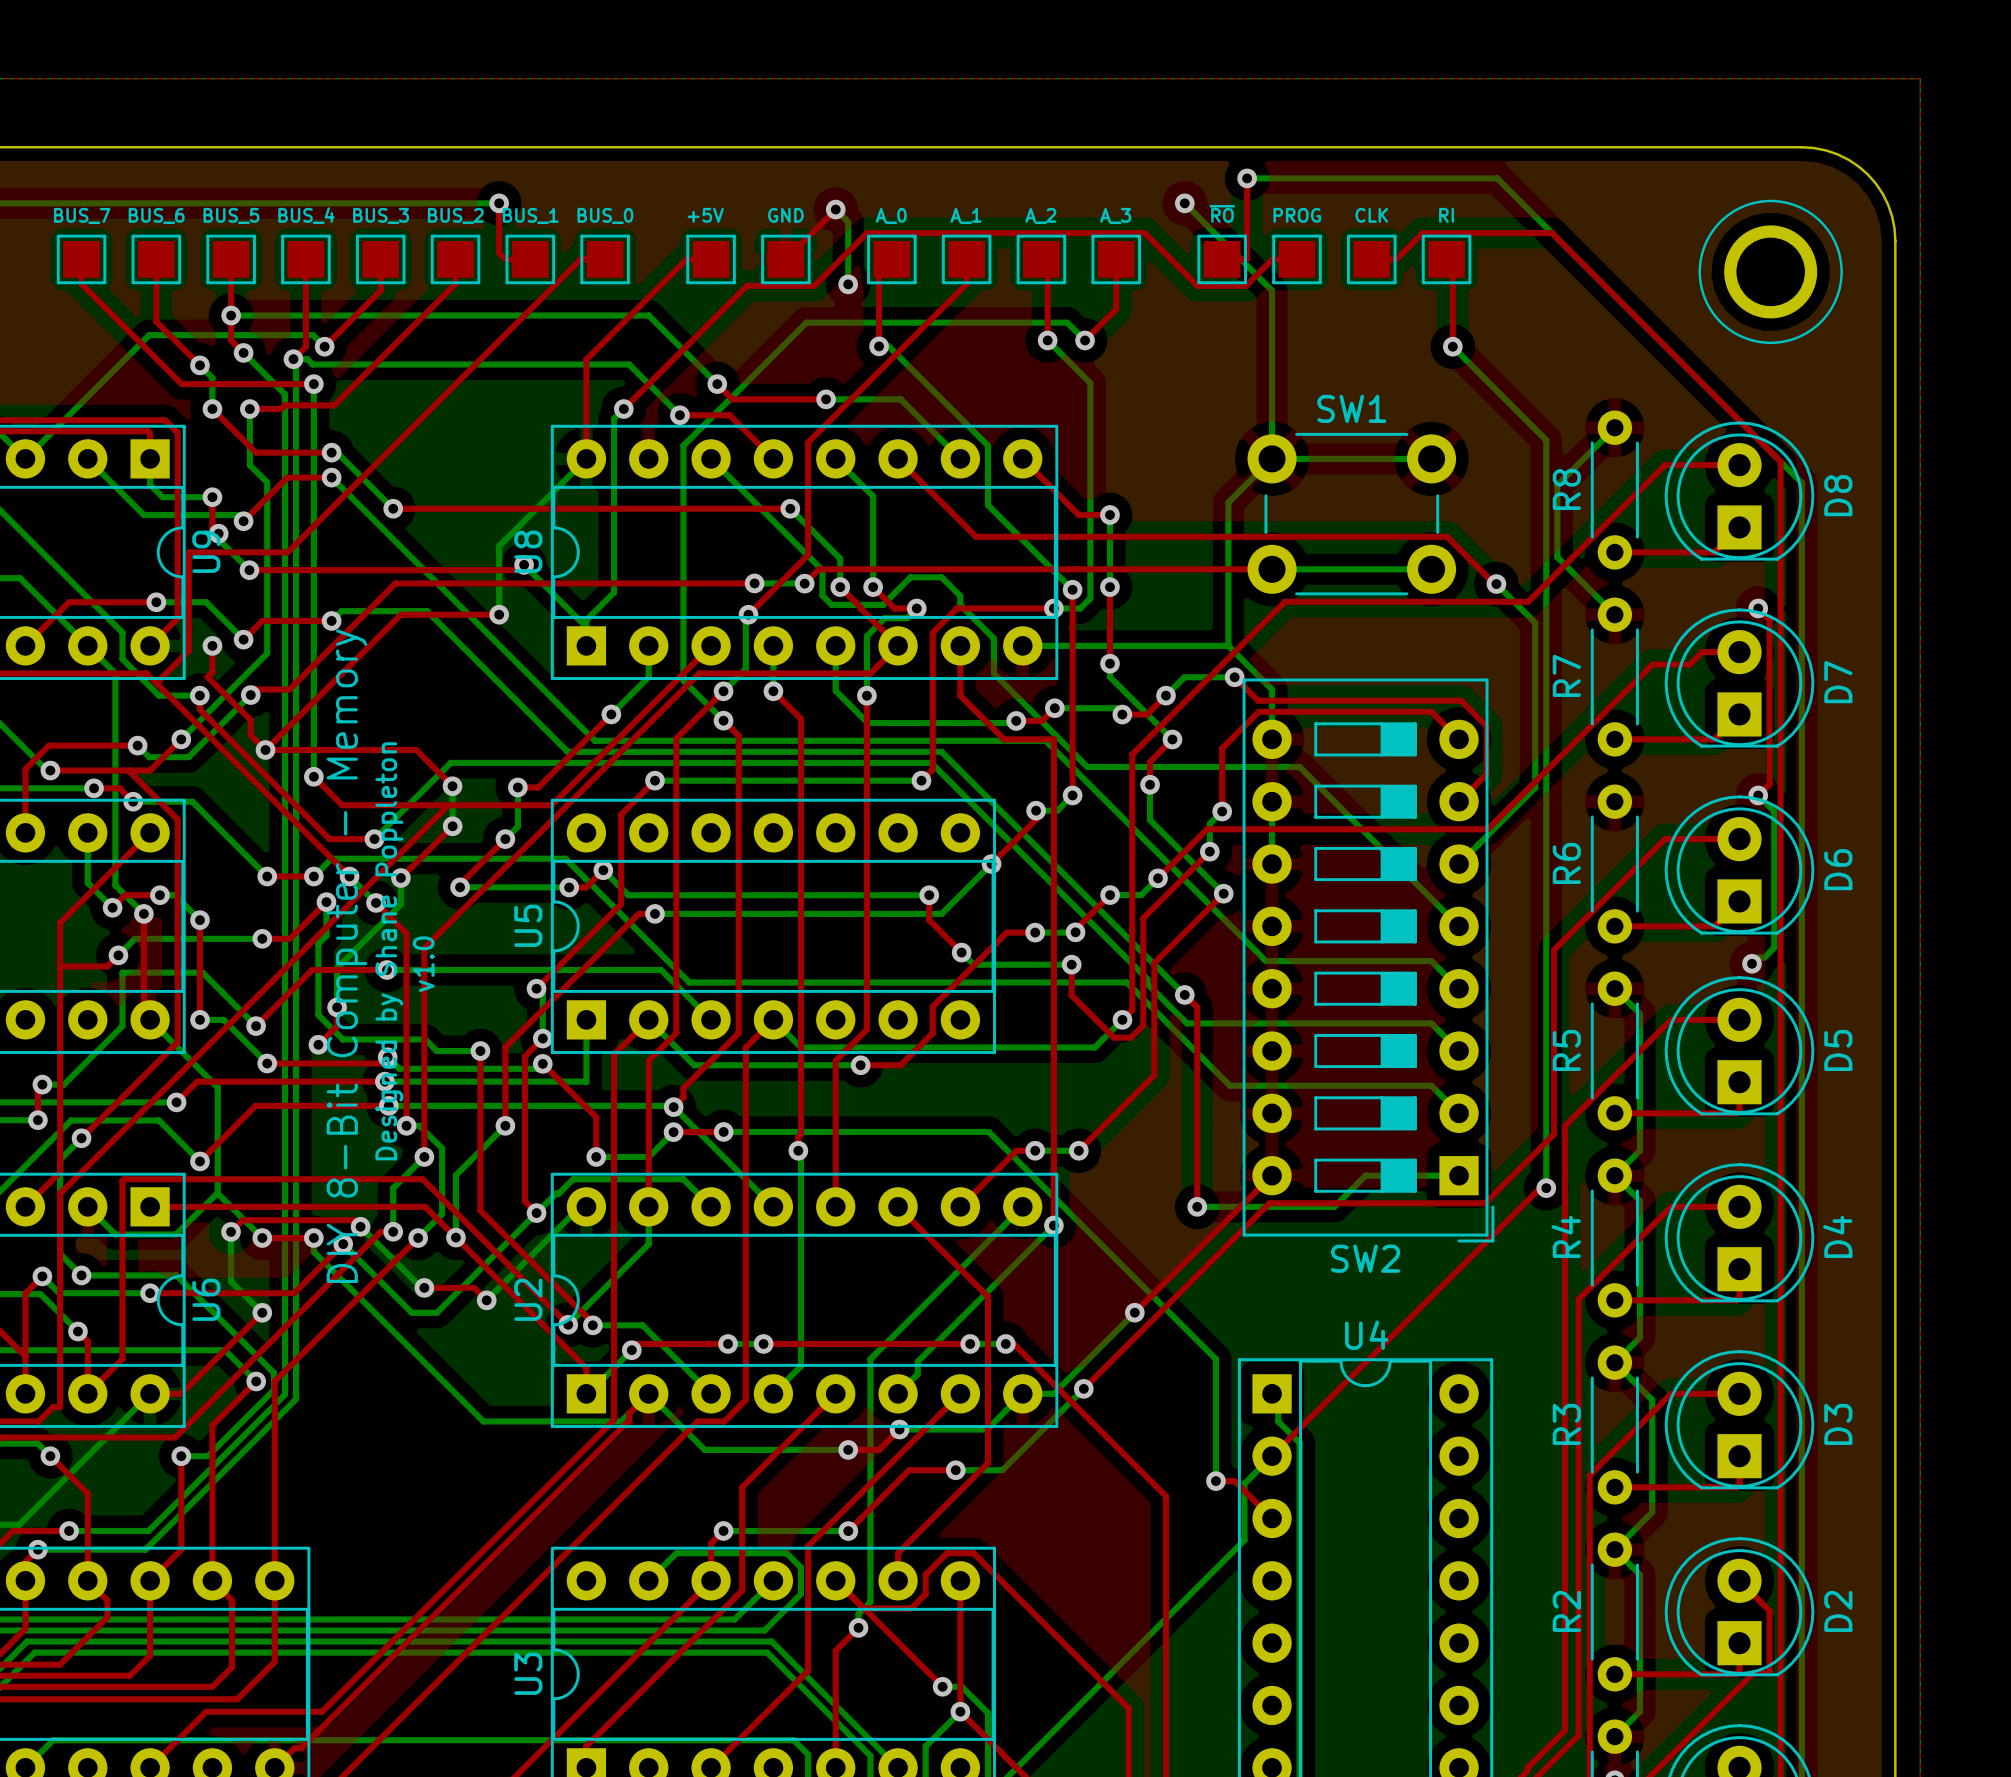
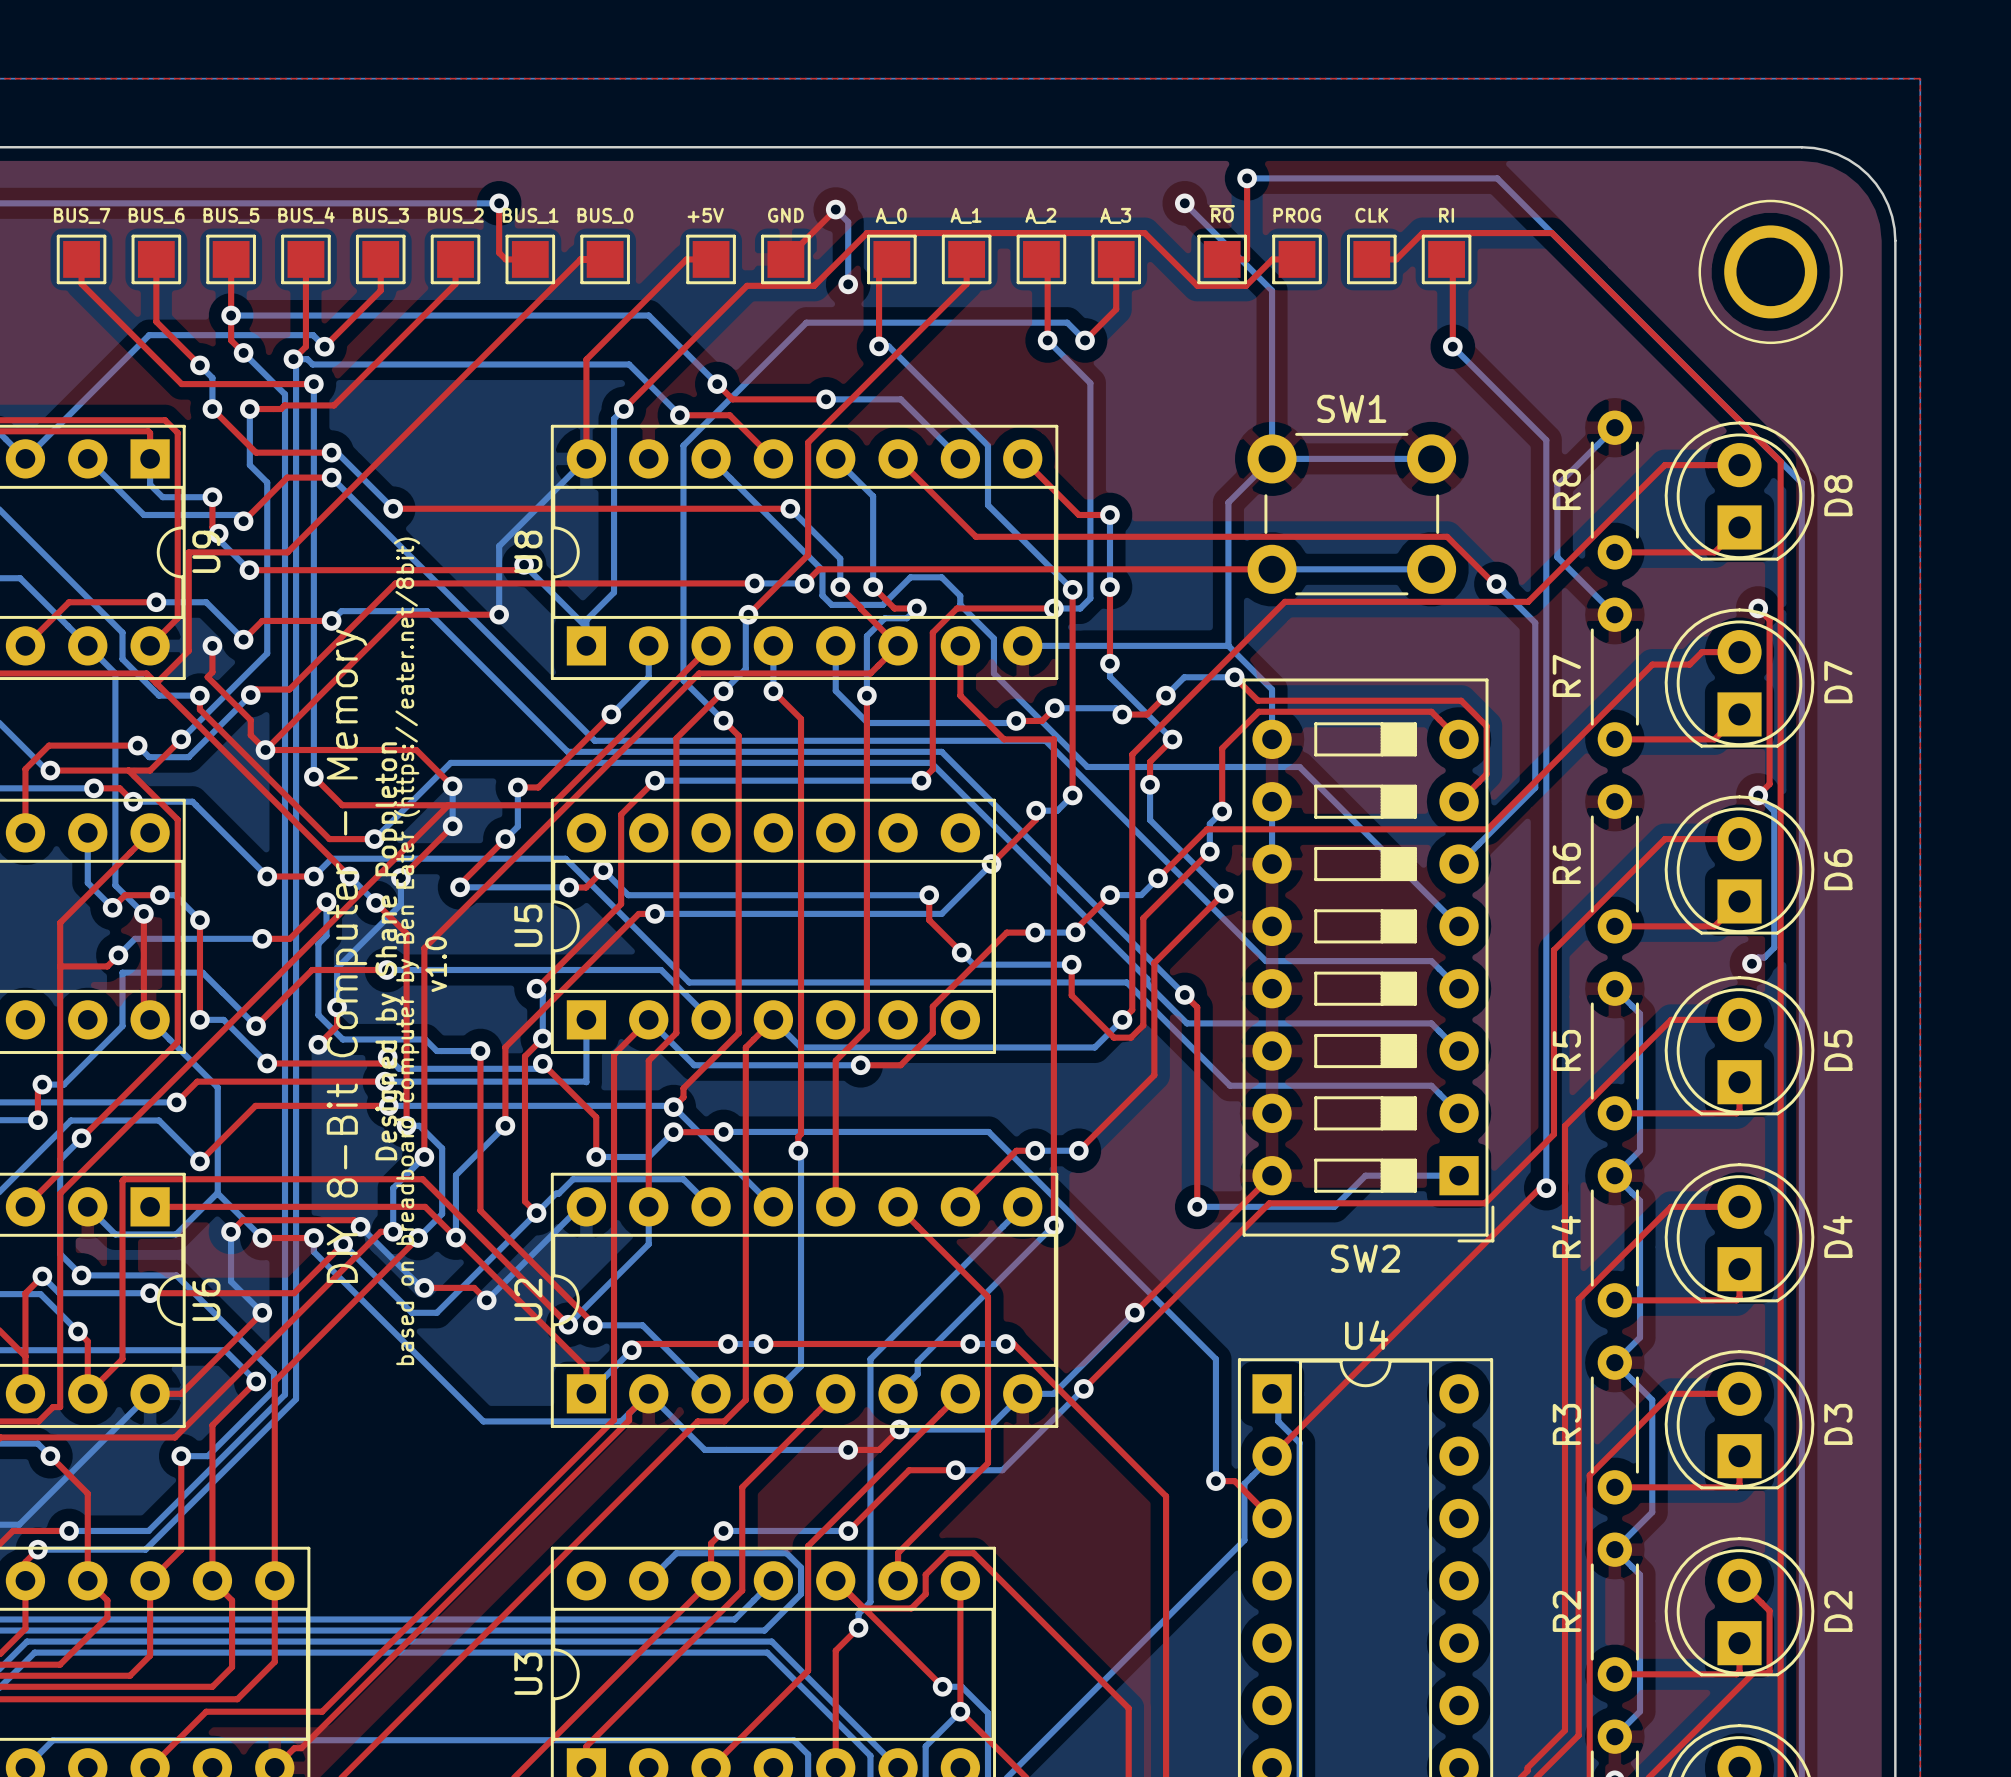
text: none -> based on breadboard computer by Ben Eater (https://eater.net/8bit) (407, 951)
text position: v1.0 (423, 964) -> v1.0 (436, 964)

